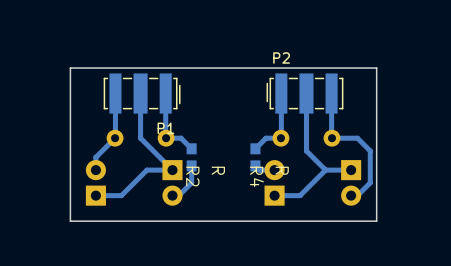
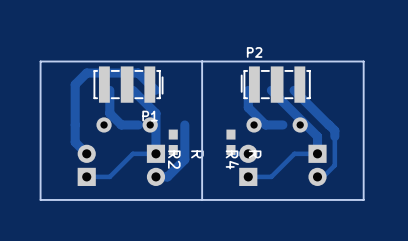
board edge: (70, 68) (70, 221) -> (63, 61) (40, 61) (40, 199) (63, 199)
board edge: none -> (202, 61) (202, 199)
board edge: (376, 68) (376, 221) -> (340, 61) (363, 61) (363, 199) (340, 199)
track: (115, 93) (115, 137) (95, 157) (95, 170) -> (155, 90) (138, 73) (86, 73) (75, 84) (75, 142) (86, 153)
track: (140, 93) (140, 138) (172, 170) -> (132, 90) (155, 113) (155, 153)
track: (165, 93) (165, 137) (181, 138) (191, 148) -> none
track: (281, 93) (281, 137) (266, 138) (255, 148) -> none
track: (306, 93) (306, 150) (325, 170) -> none
track: (331, 93) (331, 137) (357, 138) (370, 150) -> (294, 90) (334, 130) (334, 136)
track: none -> (109, 90) (109, 113) (121, 124) (138, 124)
track: none -> (248, 90) (248, 107) (265, 124) (282, 124)
track: none -> (271, 90) (317, 136) (317, 153)
track: (191, 165) (191, 182) (178, 195) -> (184, 124) (184, 159) (167, 176) (161, 176)

